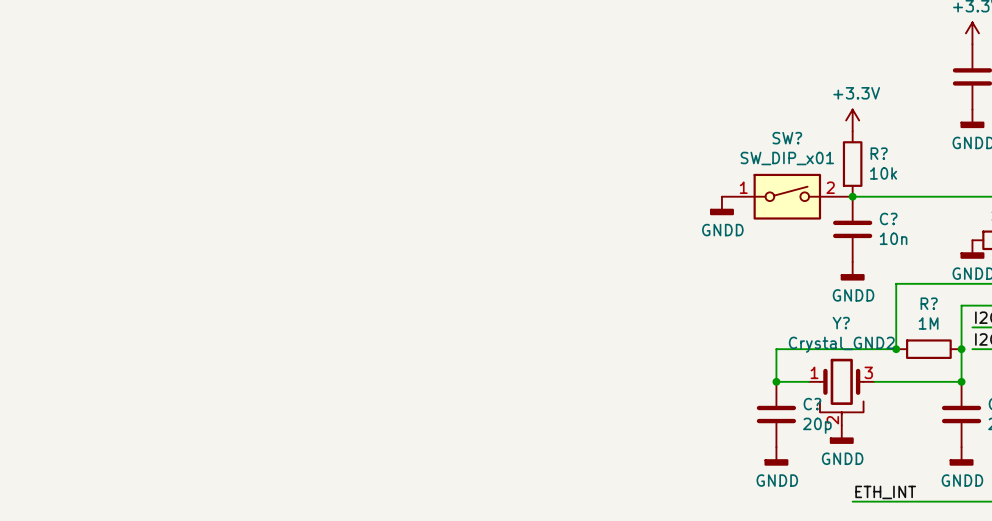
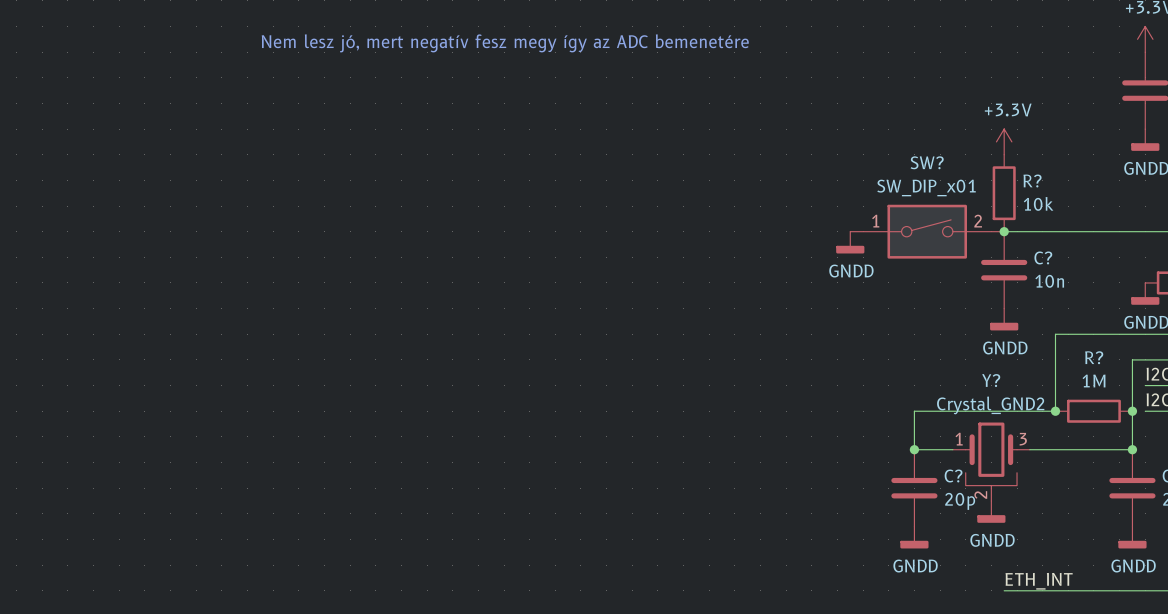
text: none -> Nem lesz jó, mert negatív fesz megy így az ADC bemenetére (505, 43)

